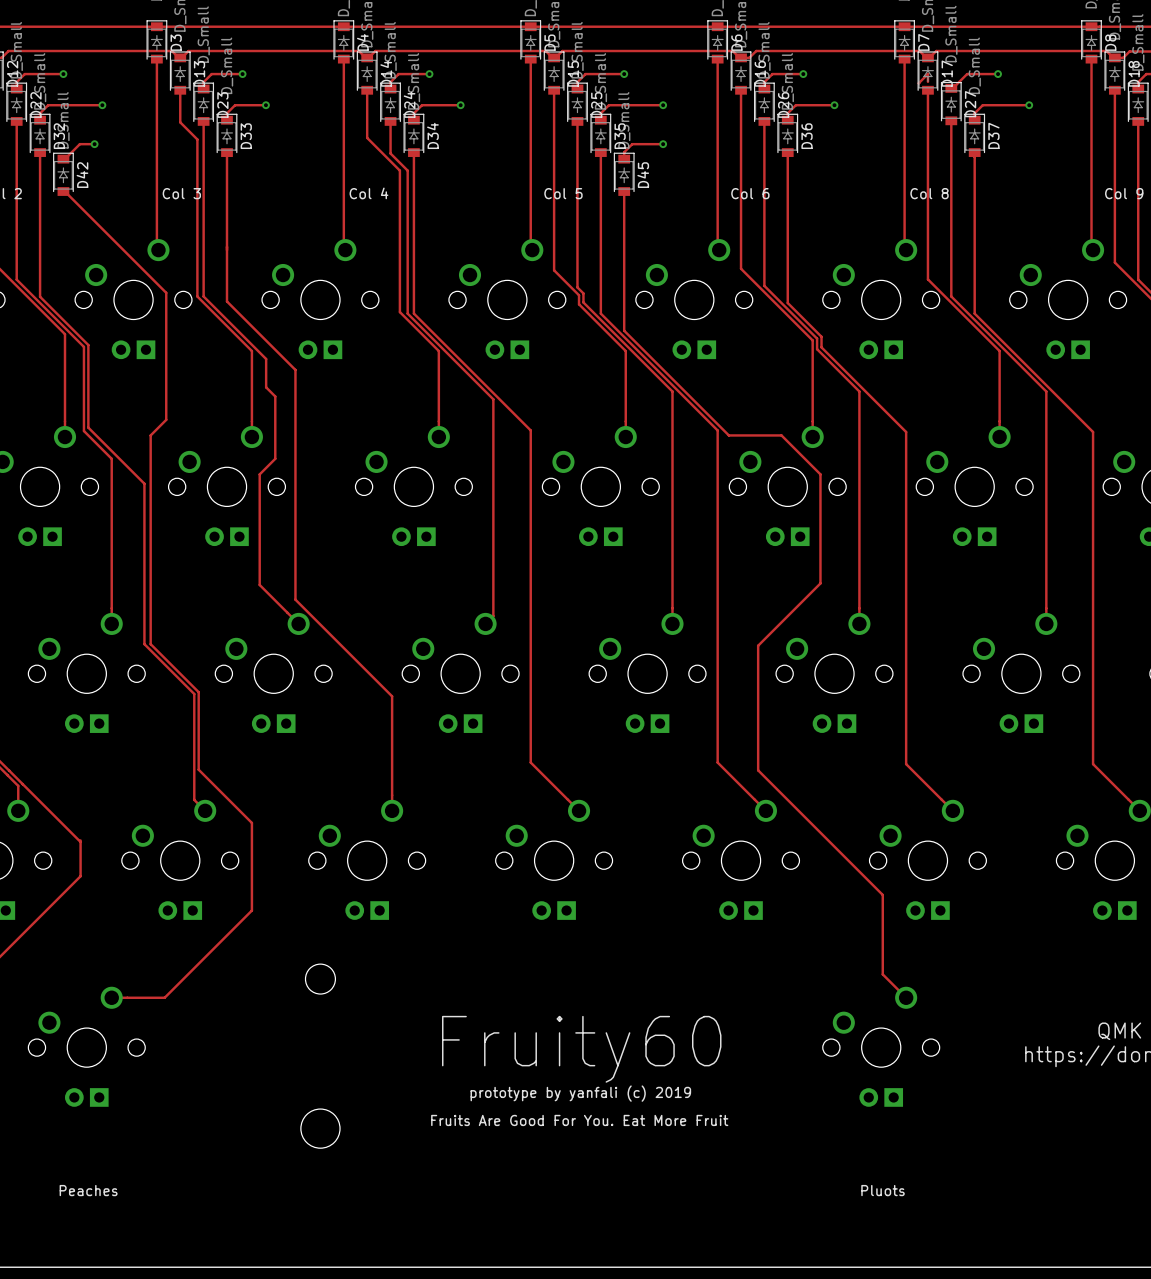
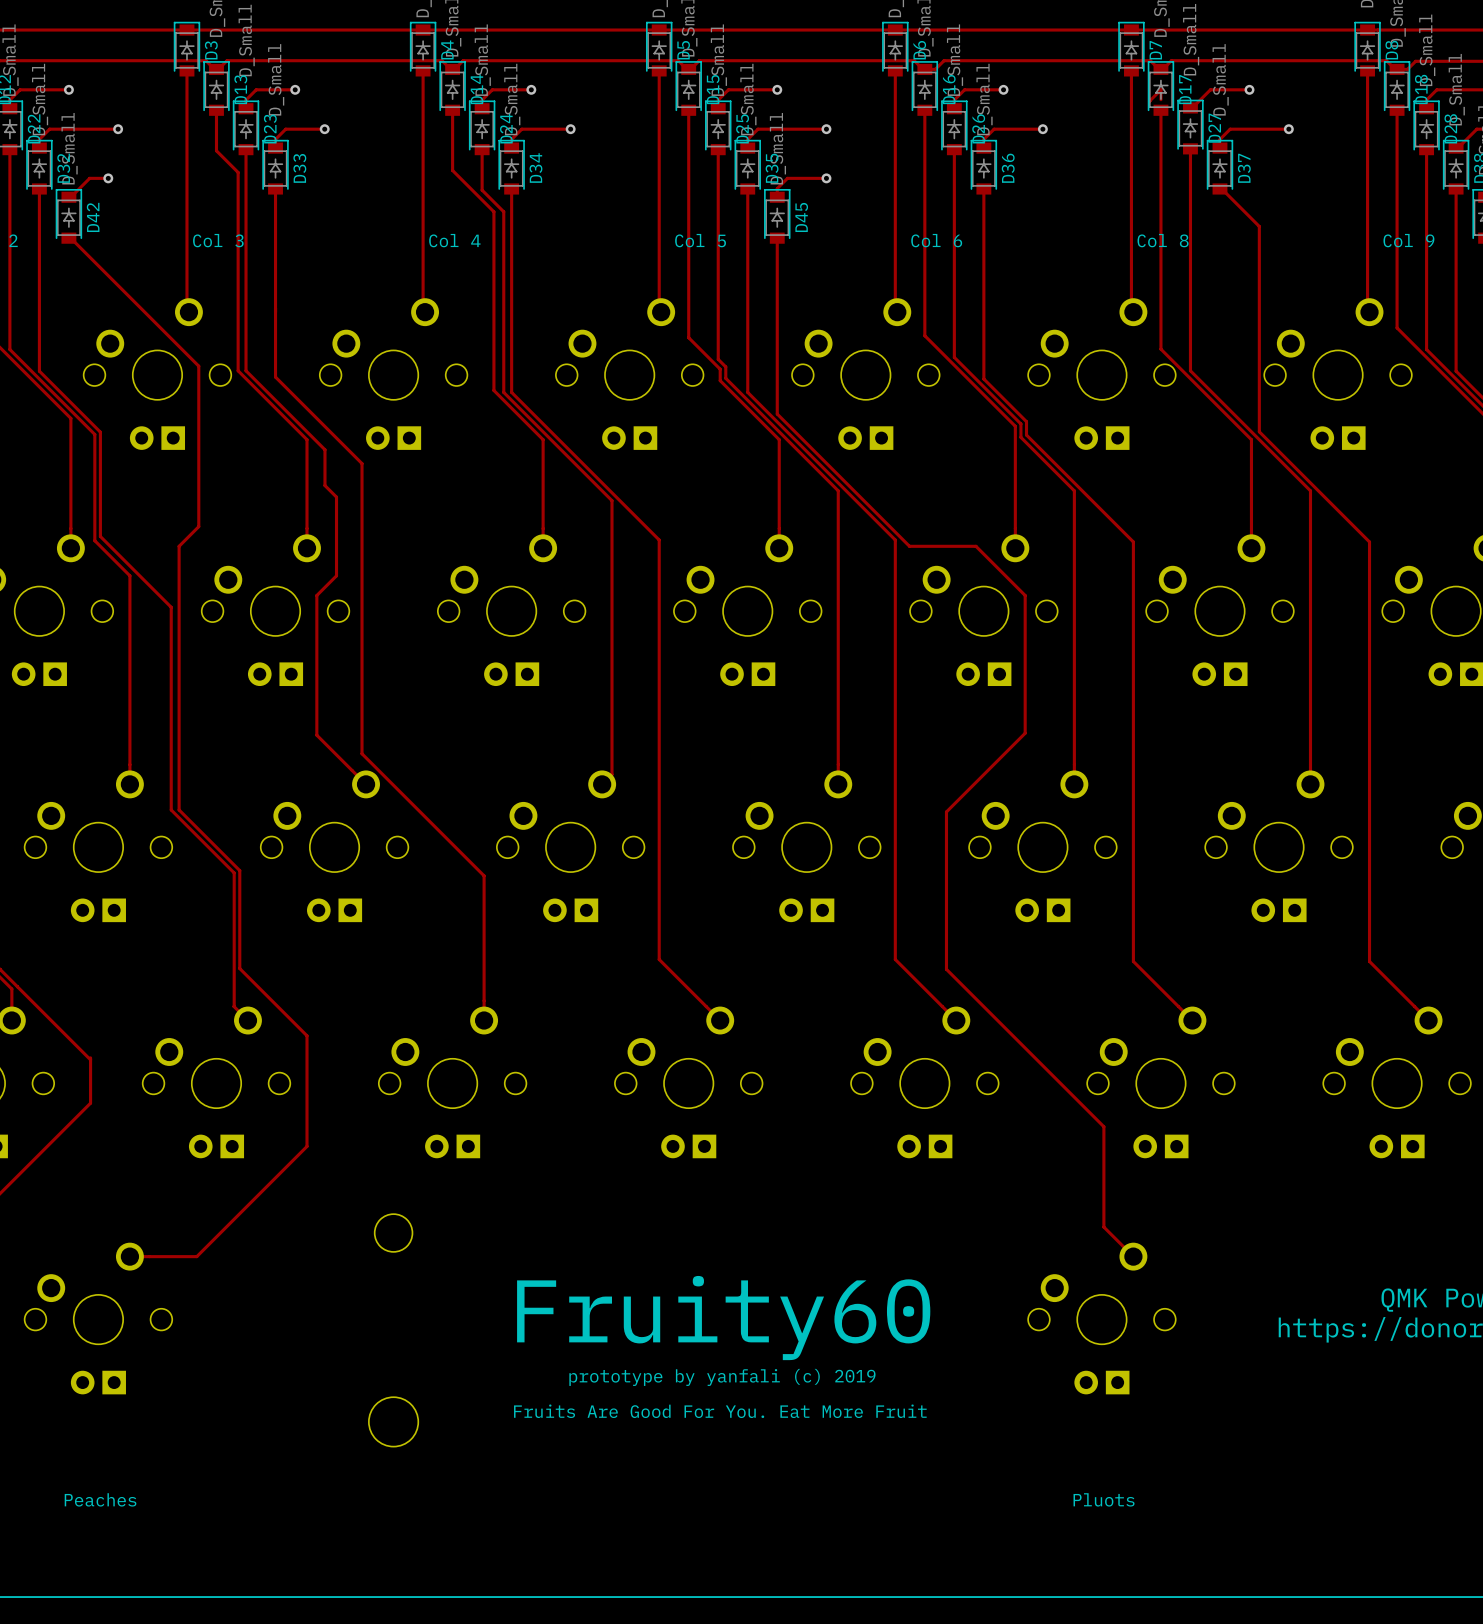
track: (973, 155) (974, 157) (974, 313) (1005, 344) -> (1221, 188) (1259, 226) (1259, 431)

